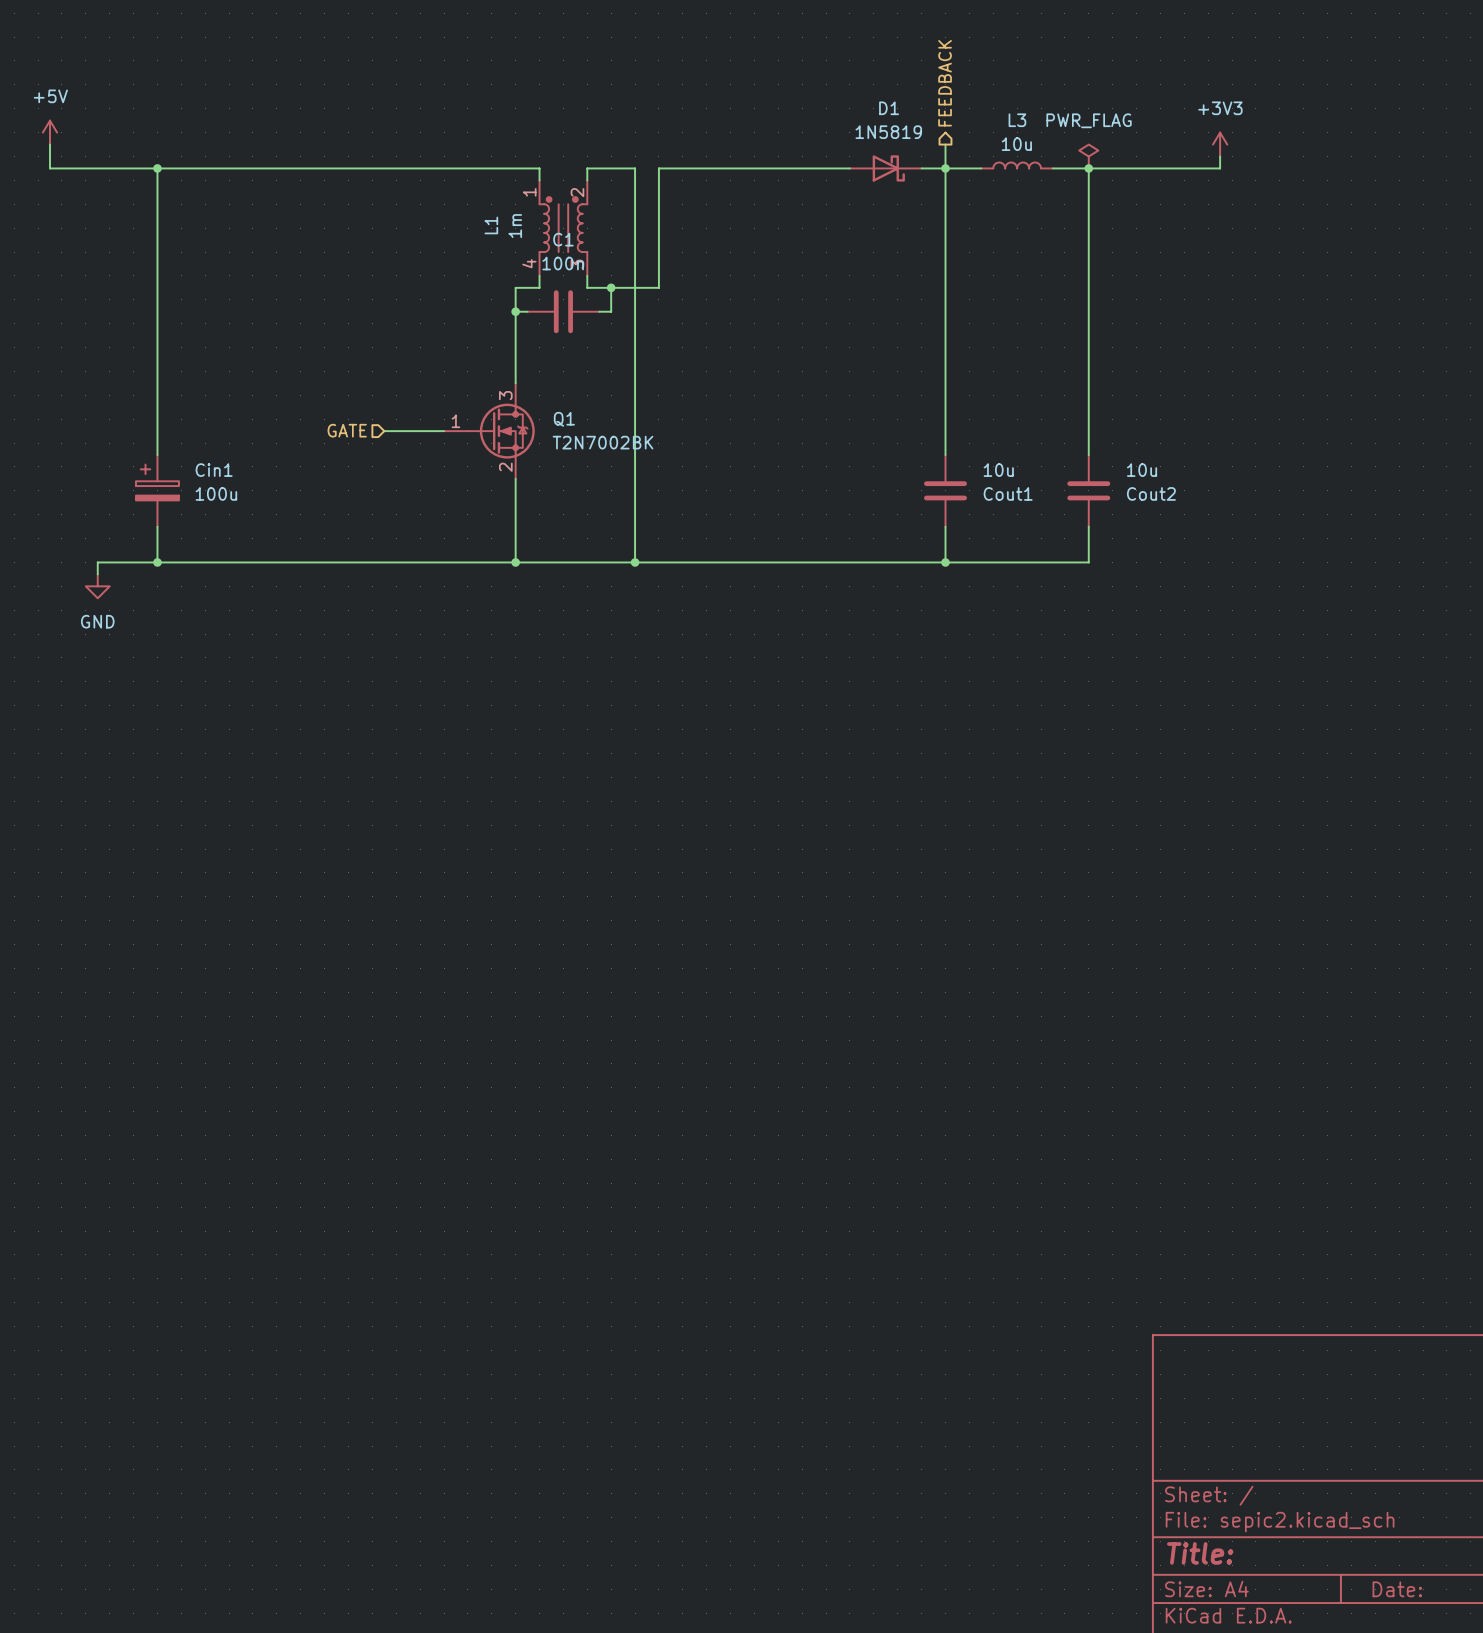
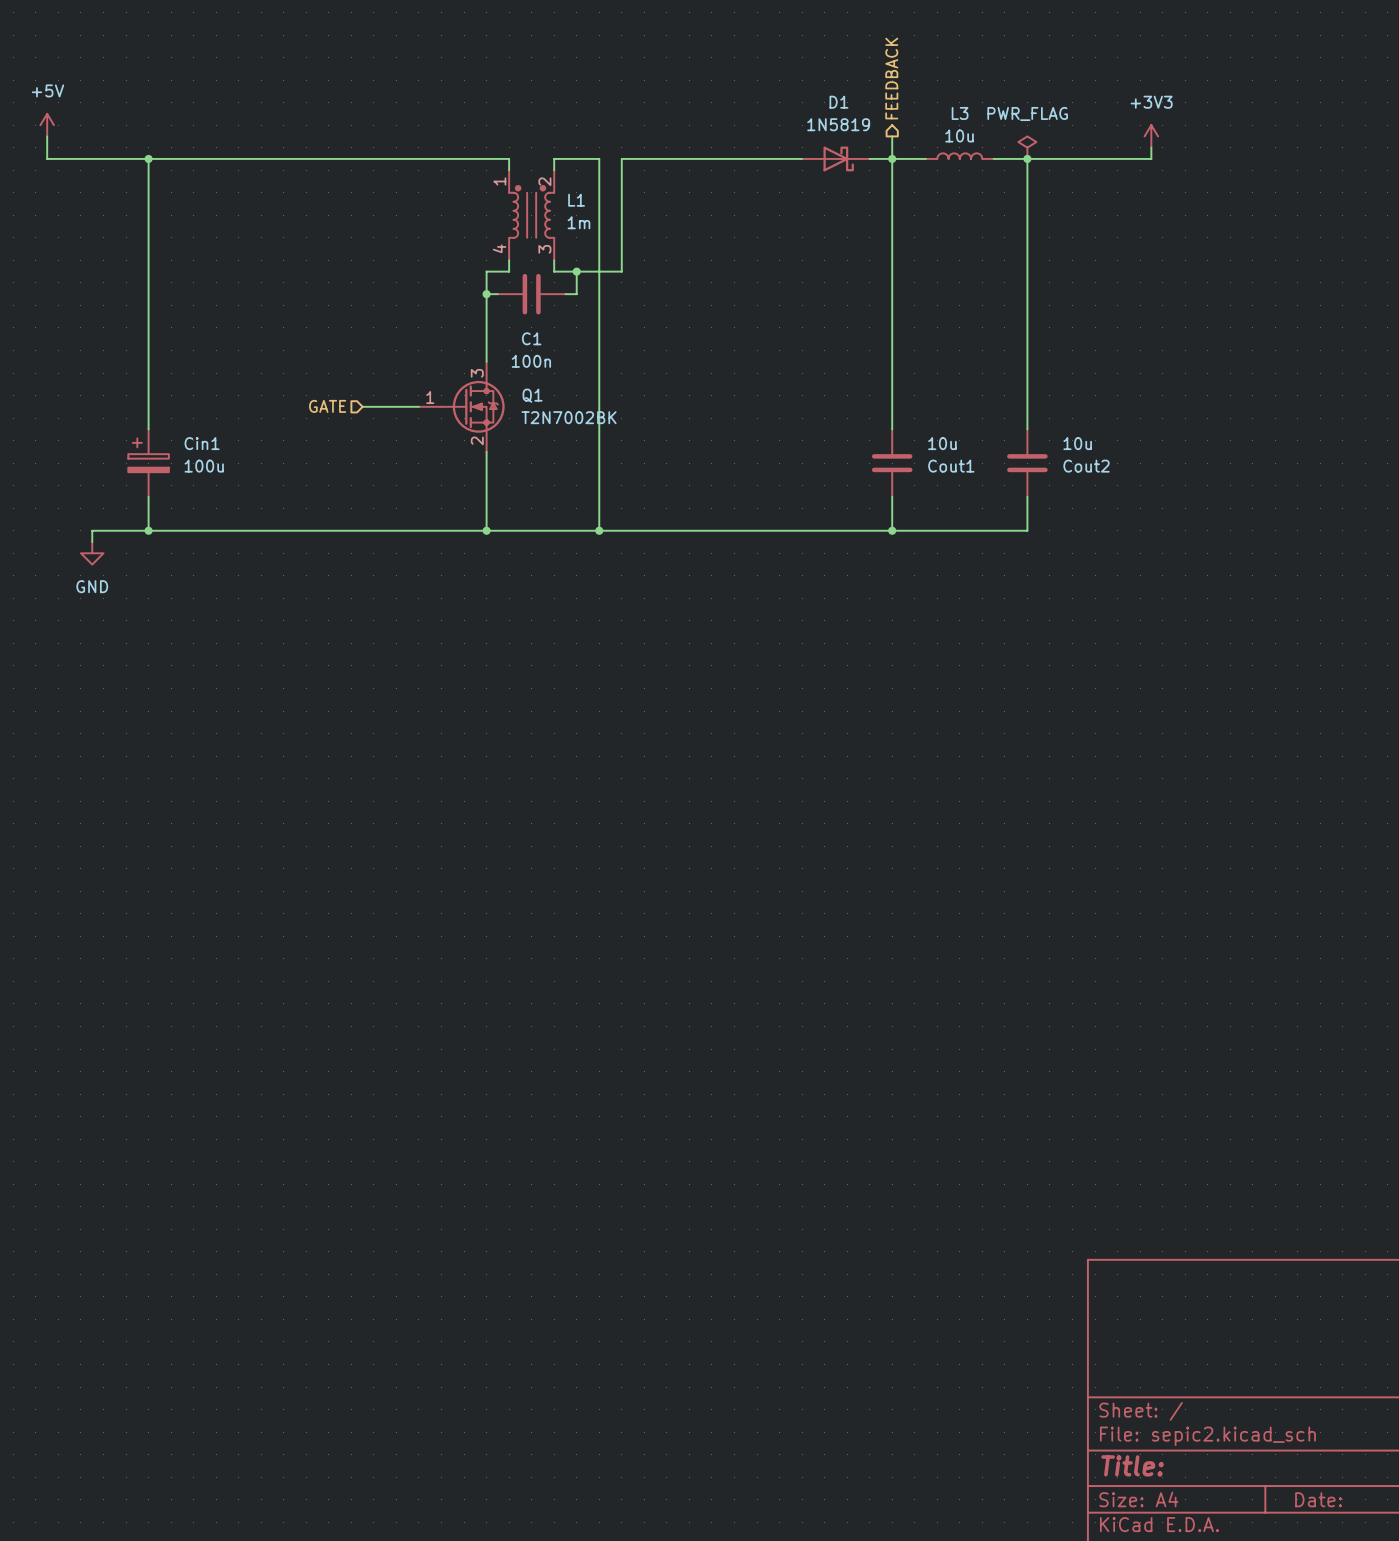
L1 name rotation: 0° (491, 225) -> 90° clockwise (576, 200)
L1 name position: L1 (491, 225) -> L1 (576, 200)
L1 value rotation: 0° (515, 226) -> 90° clockwise (578, 222)
L1 value position: 1m (515, 226) -> 1m (578, 222)
C1 name position: C1 (563, 239) -> C1 (531, 338)
C1 value position: 100n (563, 263) -> 100n (531, 361)

